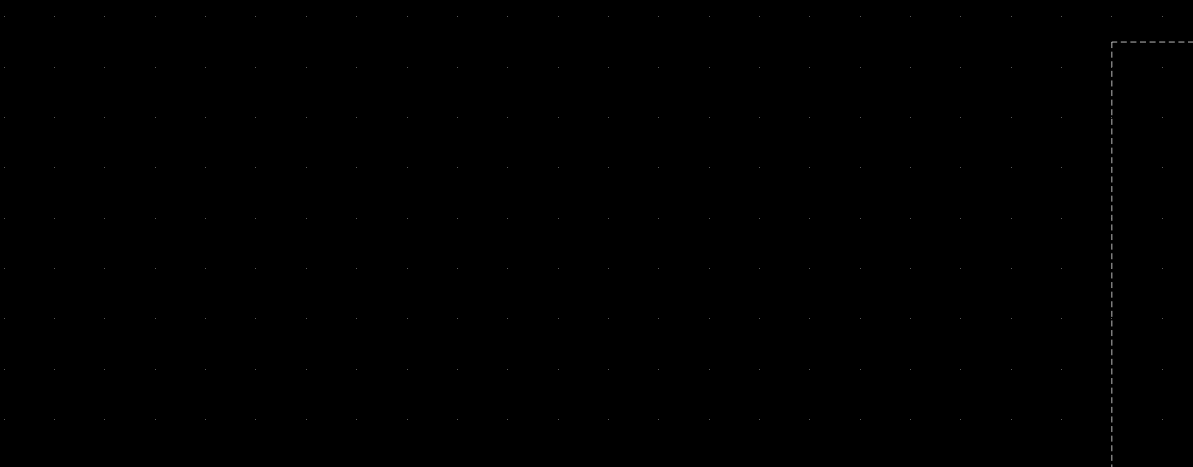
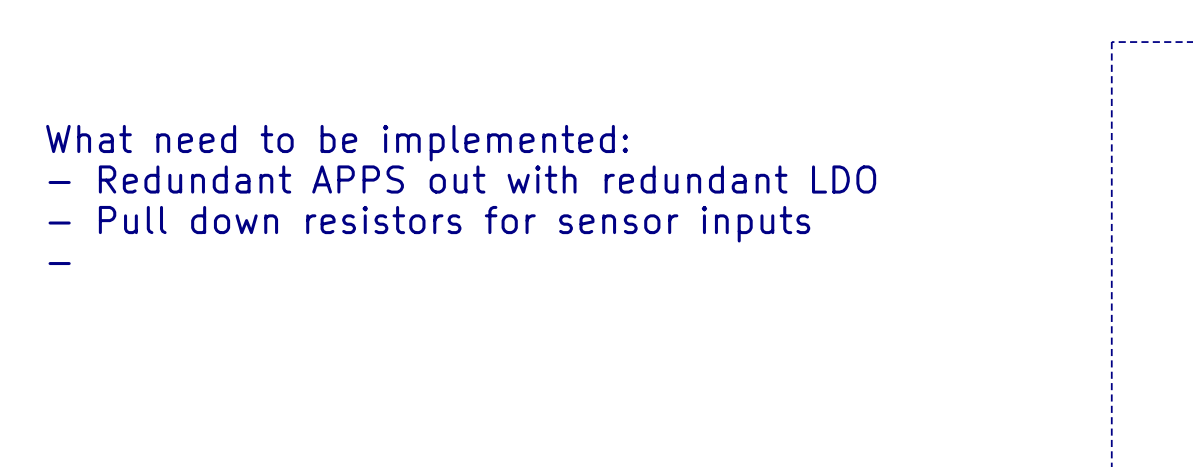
text: none -> What need to be implemented: (337, 143)
text: none -> - Redundant APPS out with redundant LDO (462, 179)
text: none -> - Pull down resistors for sensor inputs (429, 224)
text: none -> - (59, 263)

